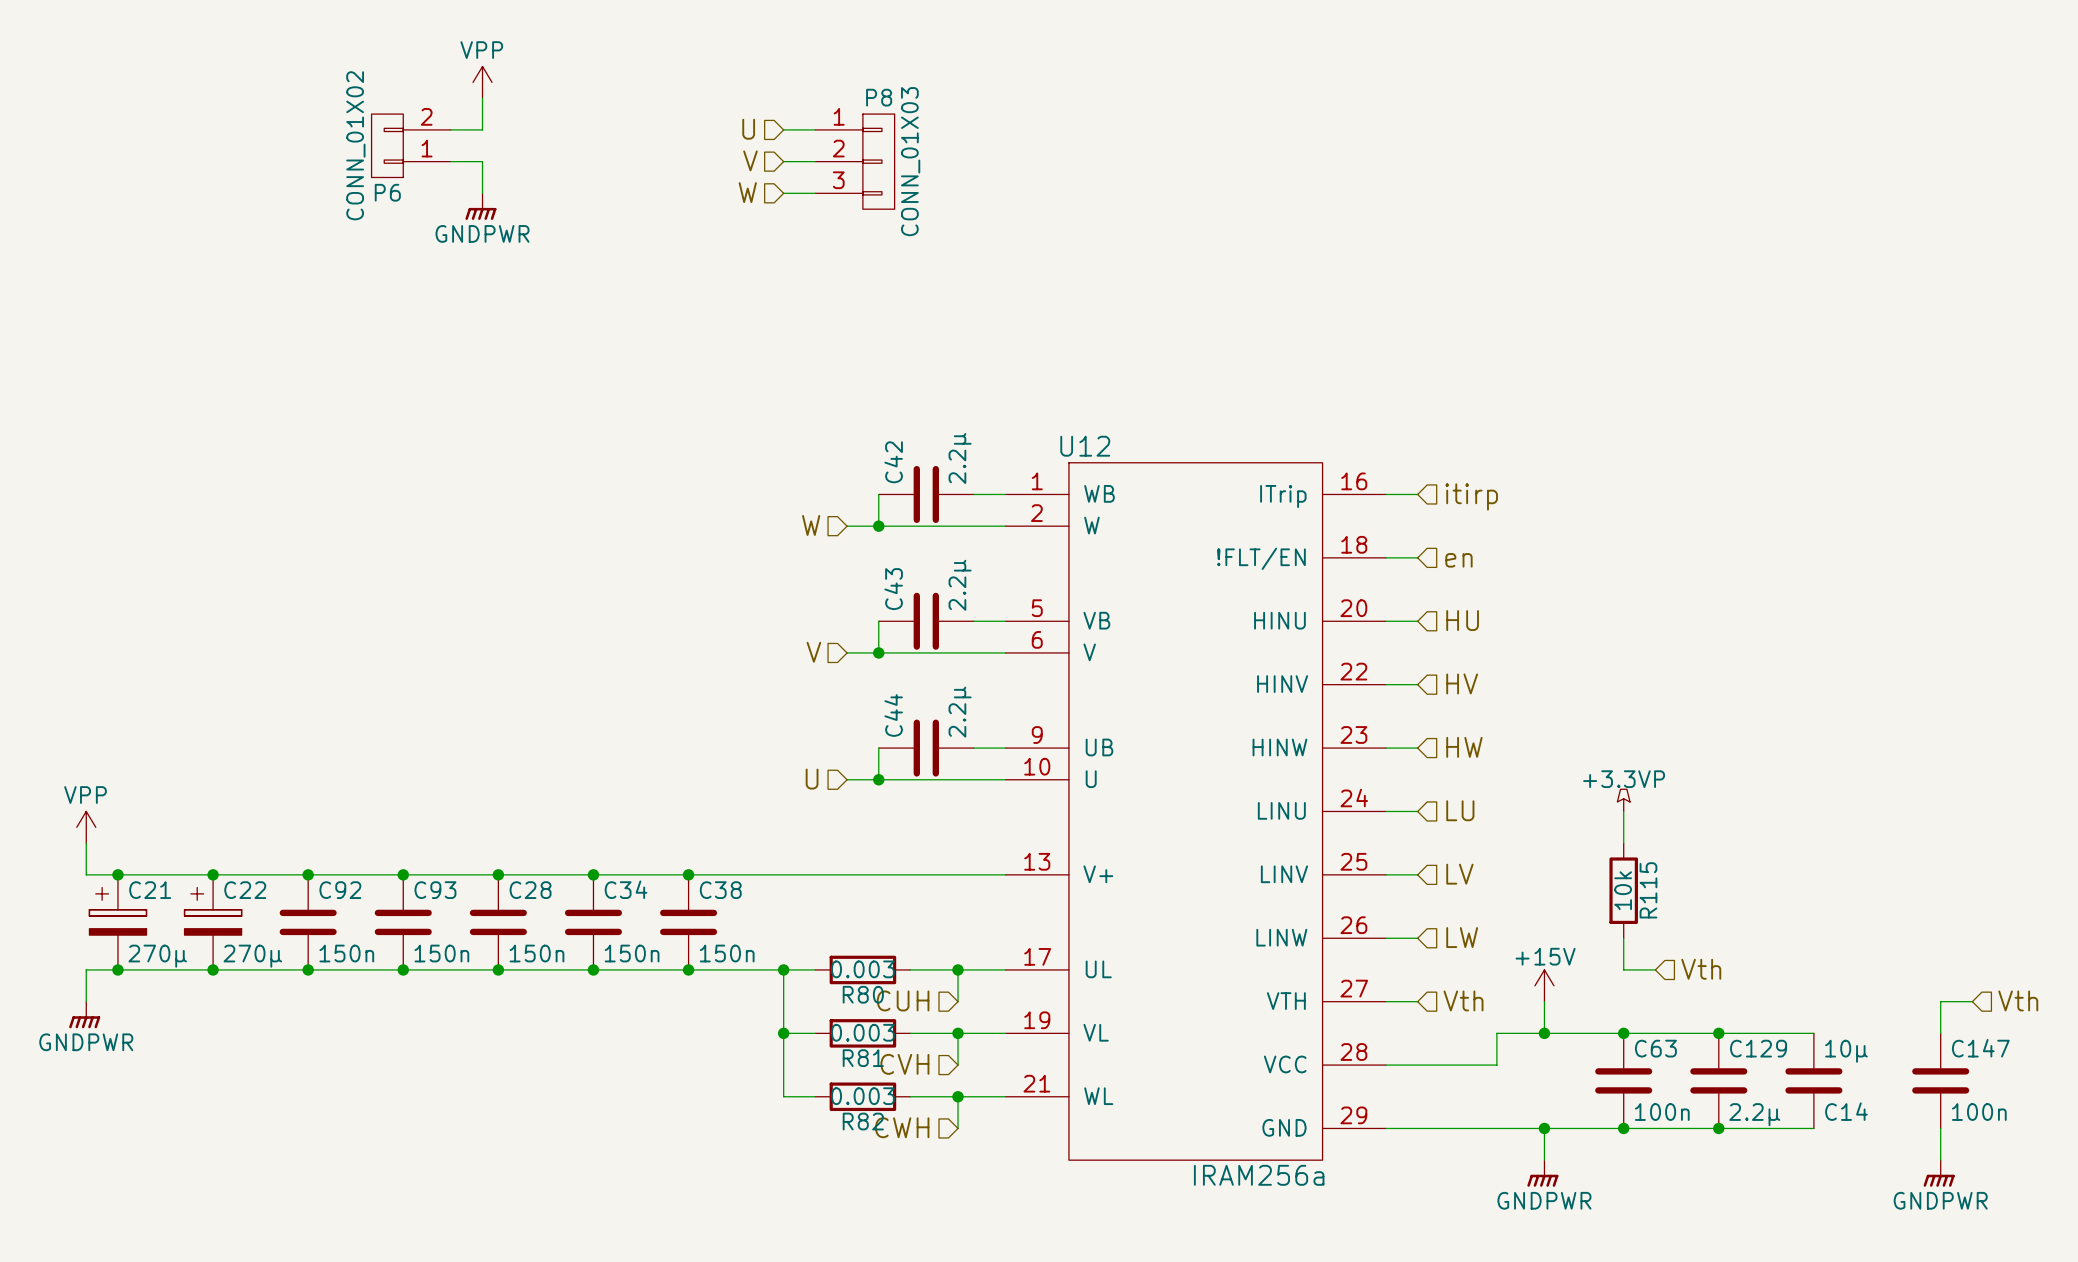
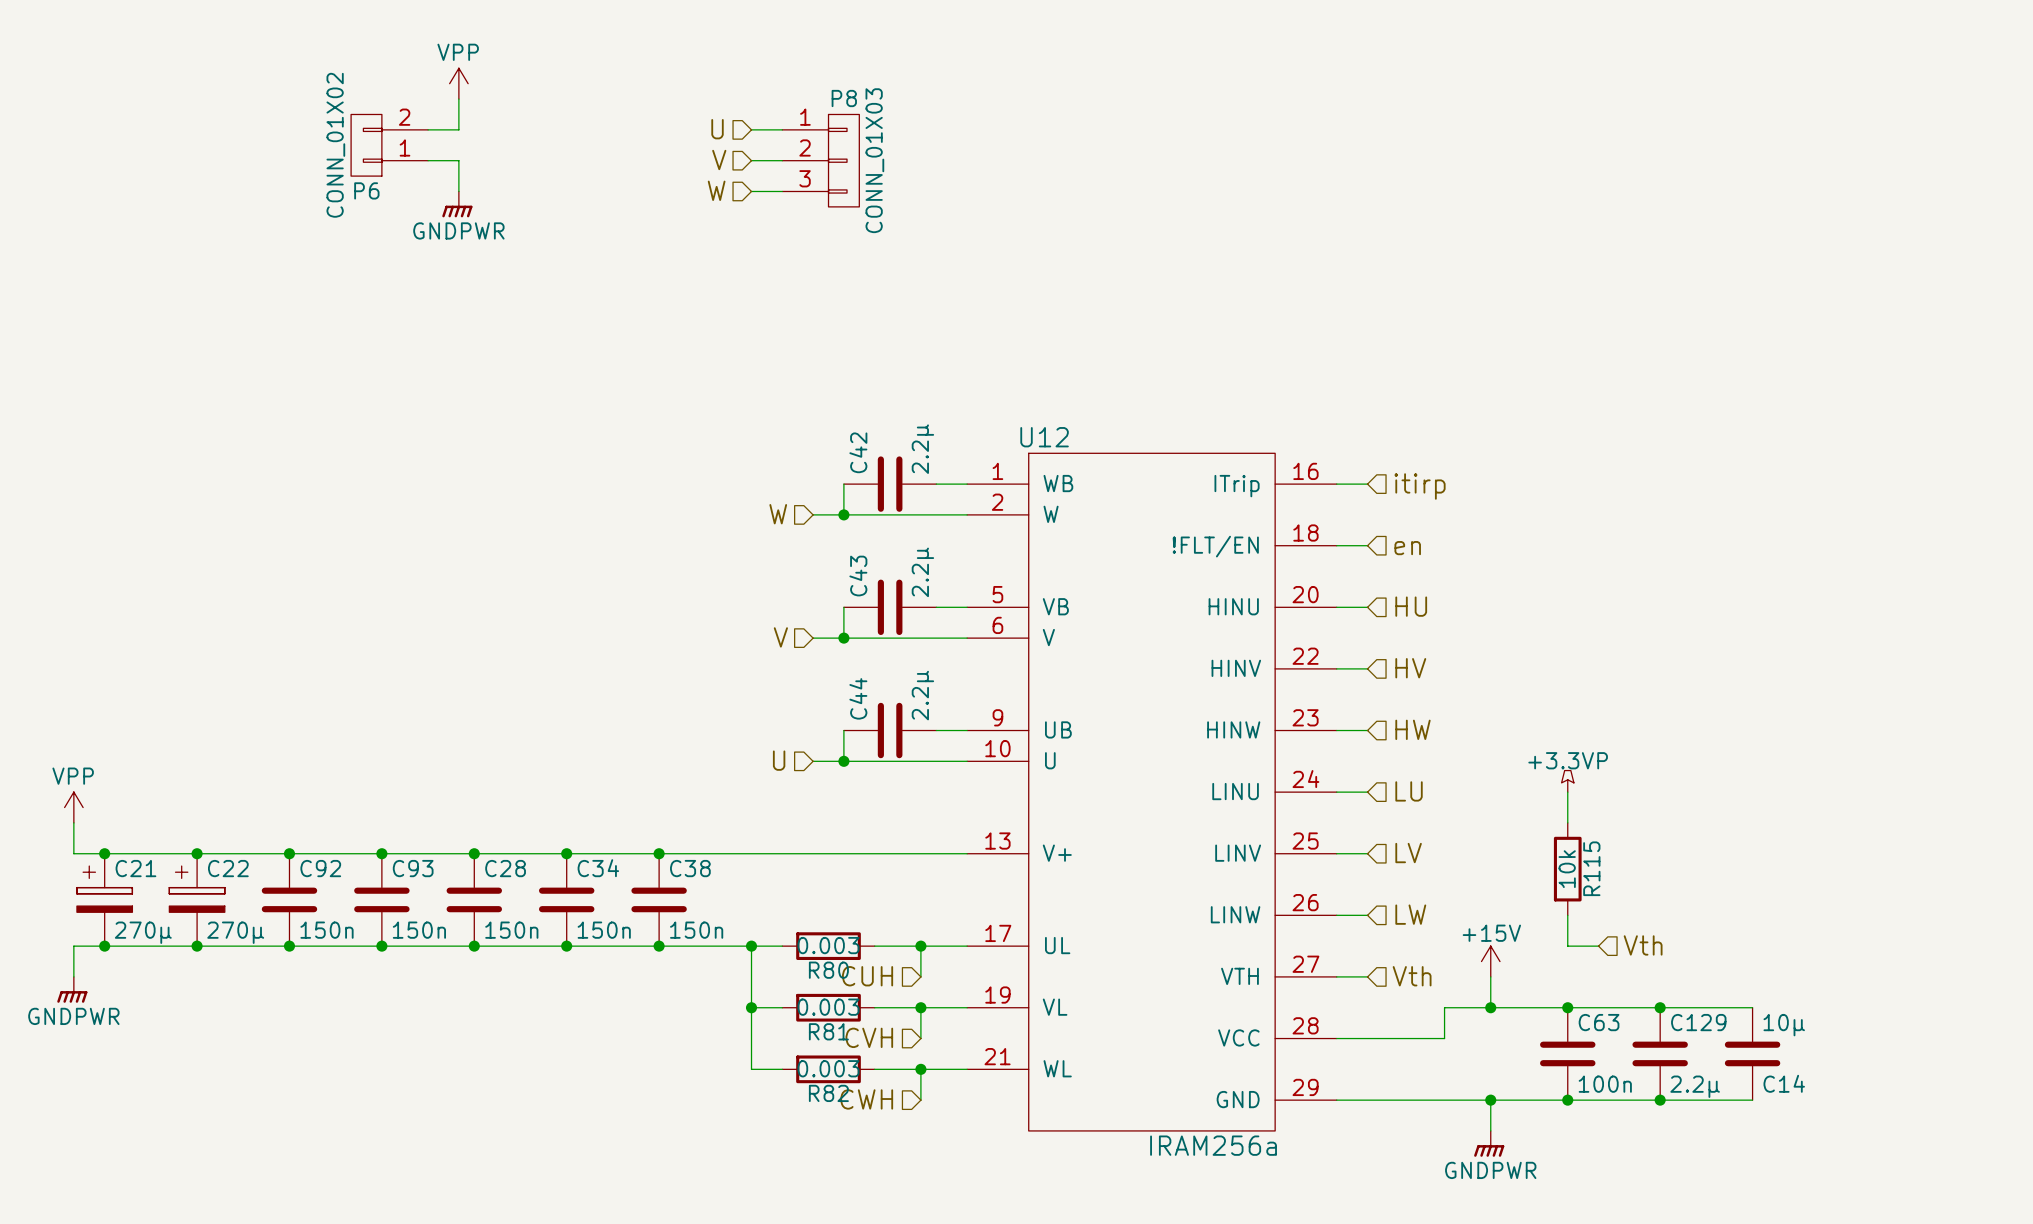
hierarchical label: Vth (2018, 1000) -> none
wire: (1972, 1001) (1940, 1001) (1940, 1033) -> none
C147: 100n (1940, 1080) -> none
wire: (1940, 1128) (1940, 1160) -> none
power symbol: GNDPWR (1939, 1173) -> none

